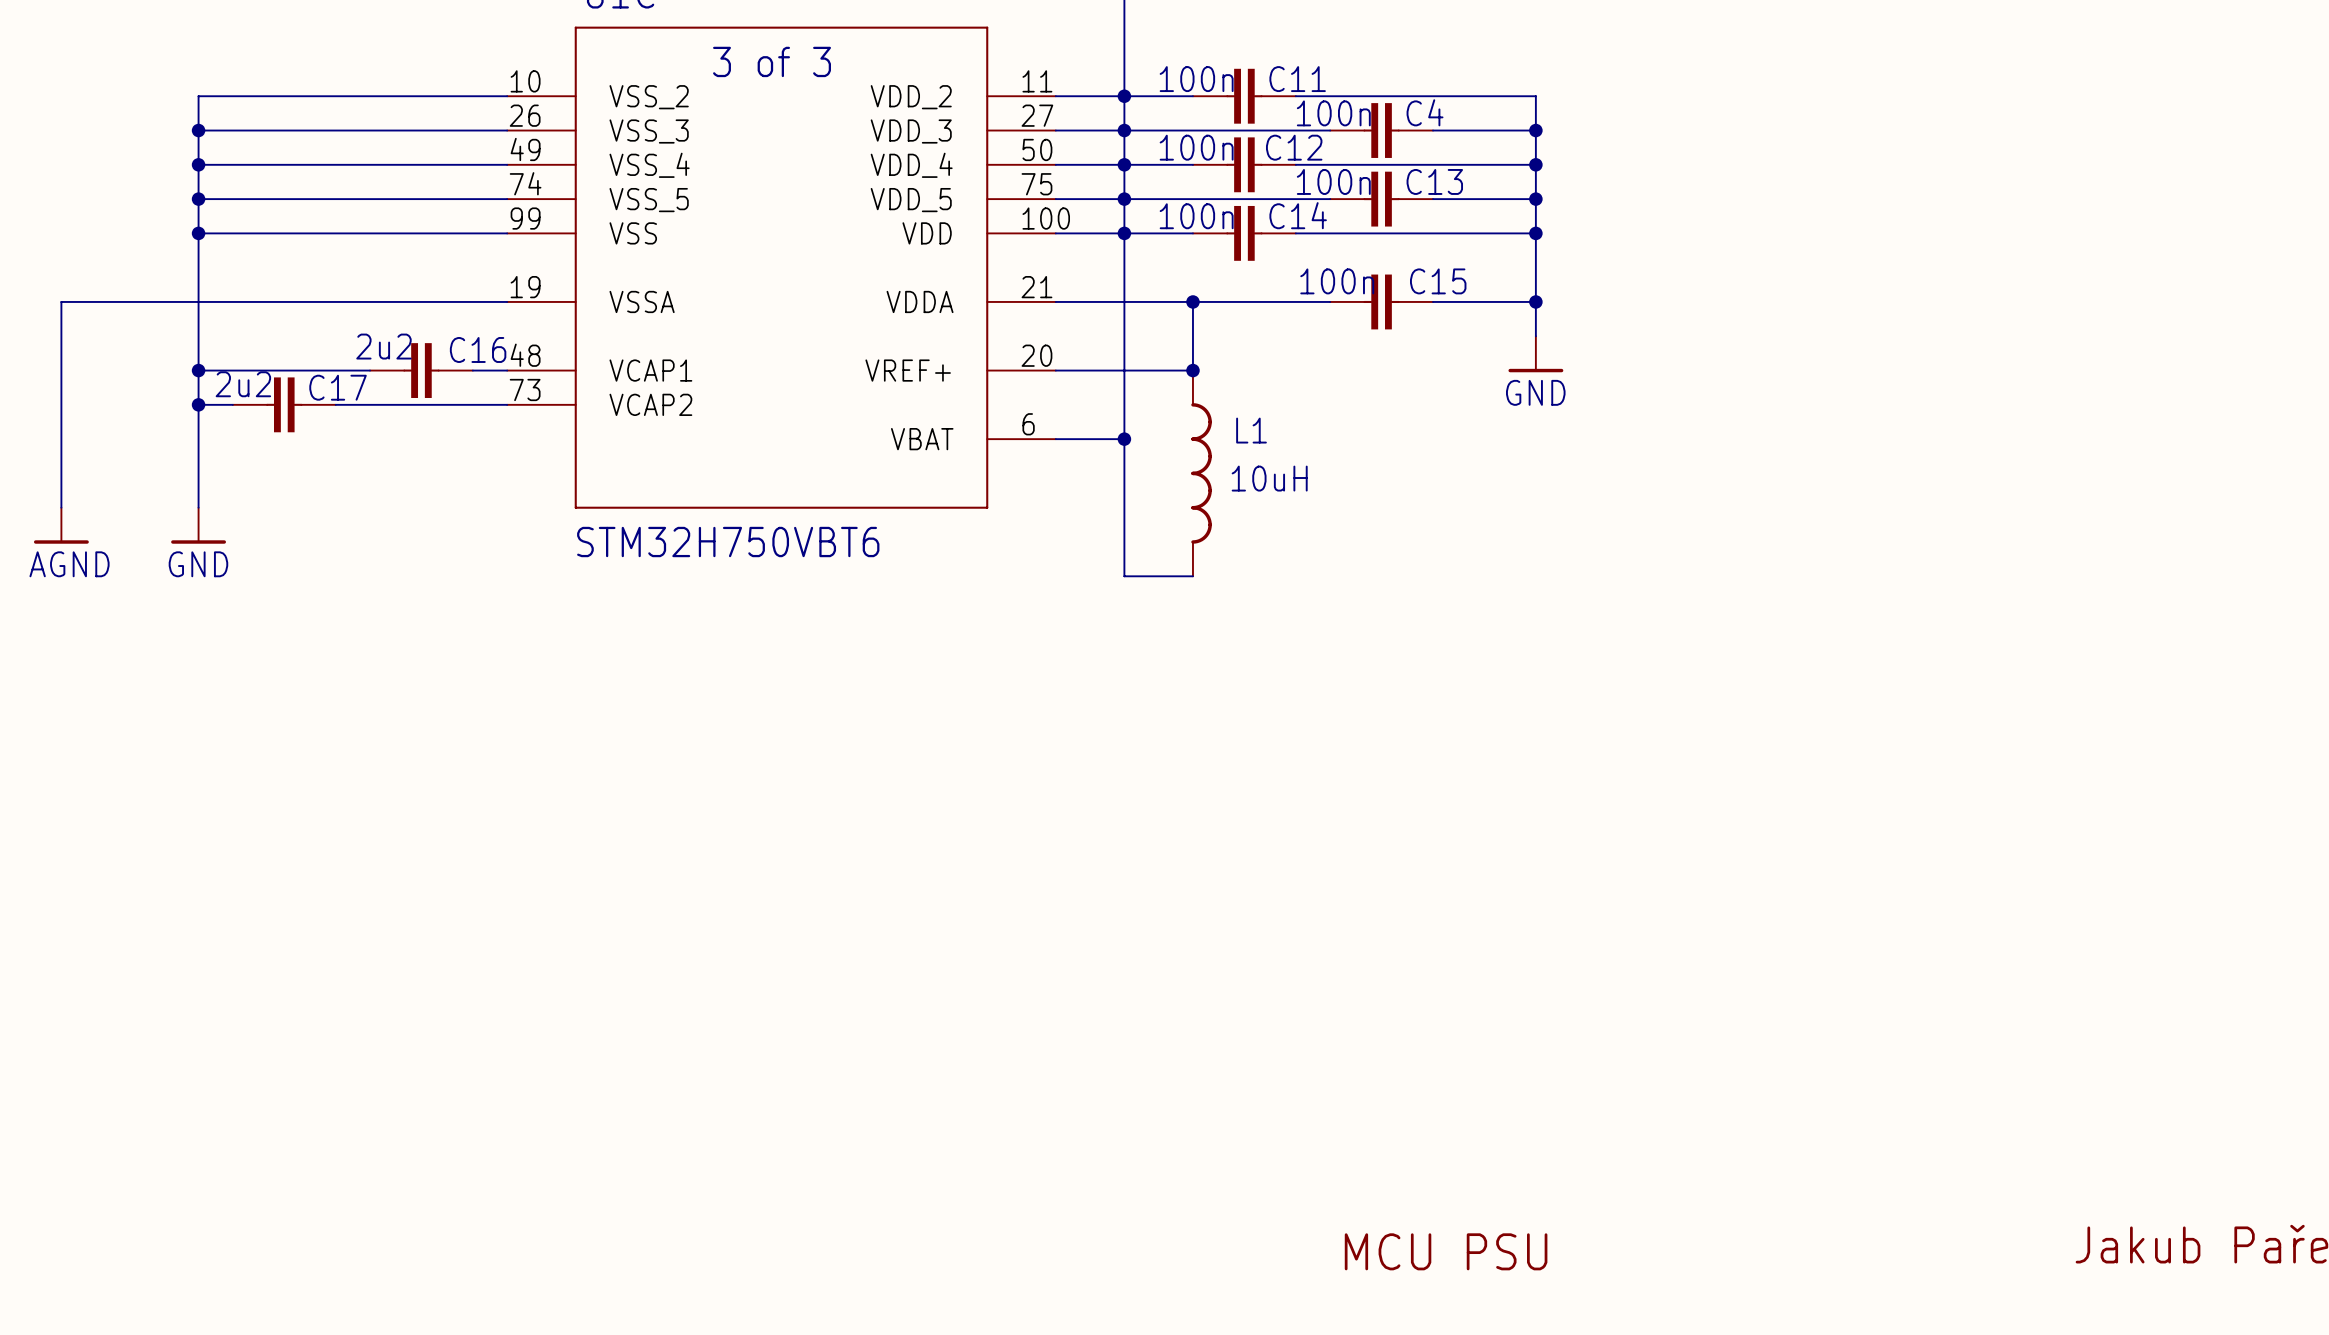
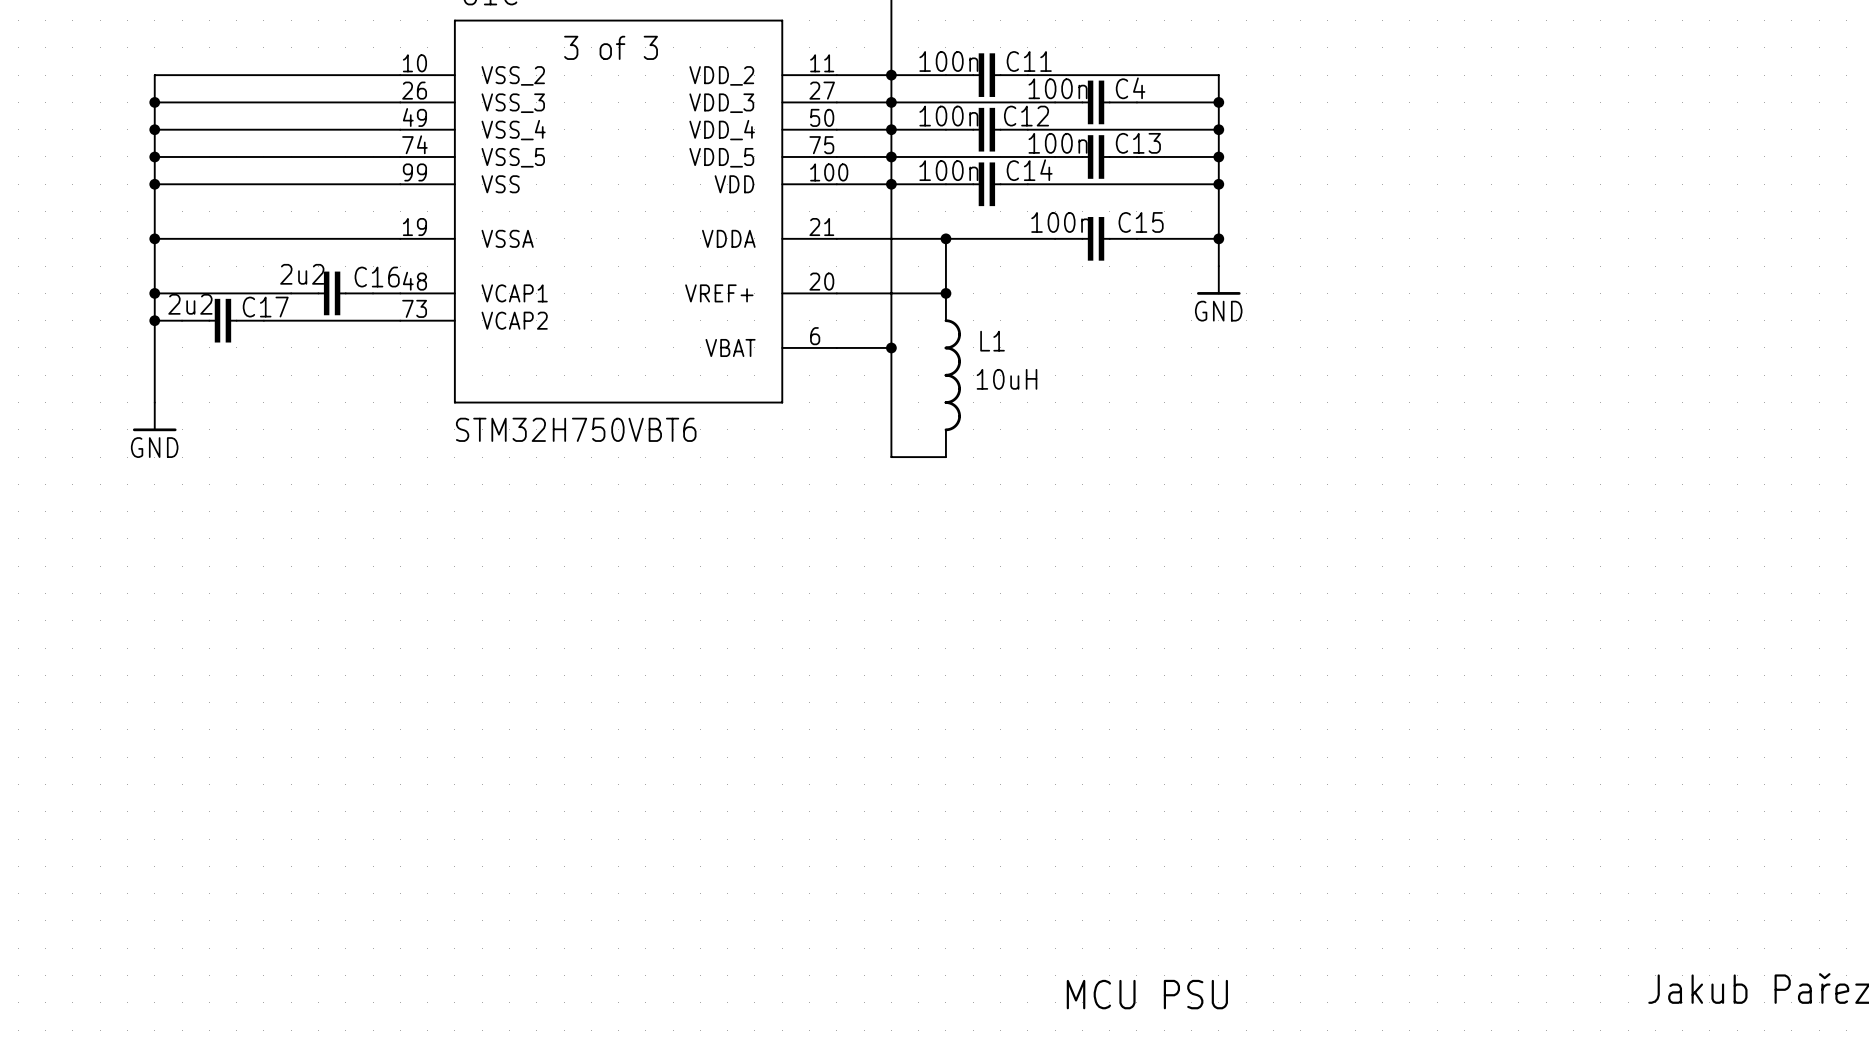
wire: (198, 301) (61, 301) (61, 507) -> none
junction: none -> (154, 238)
power symbol: AGND (61, 525) -> none

